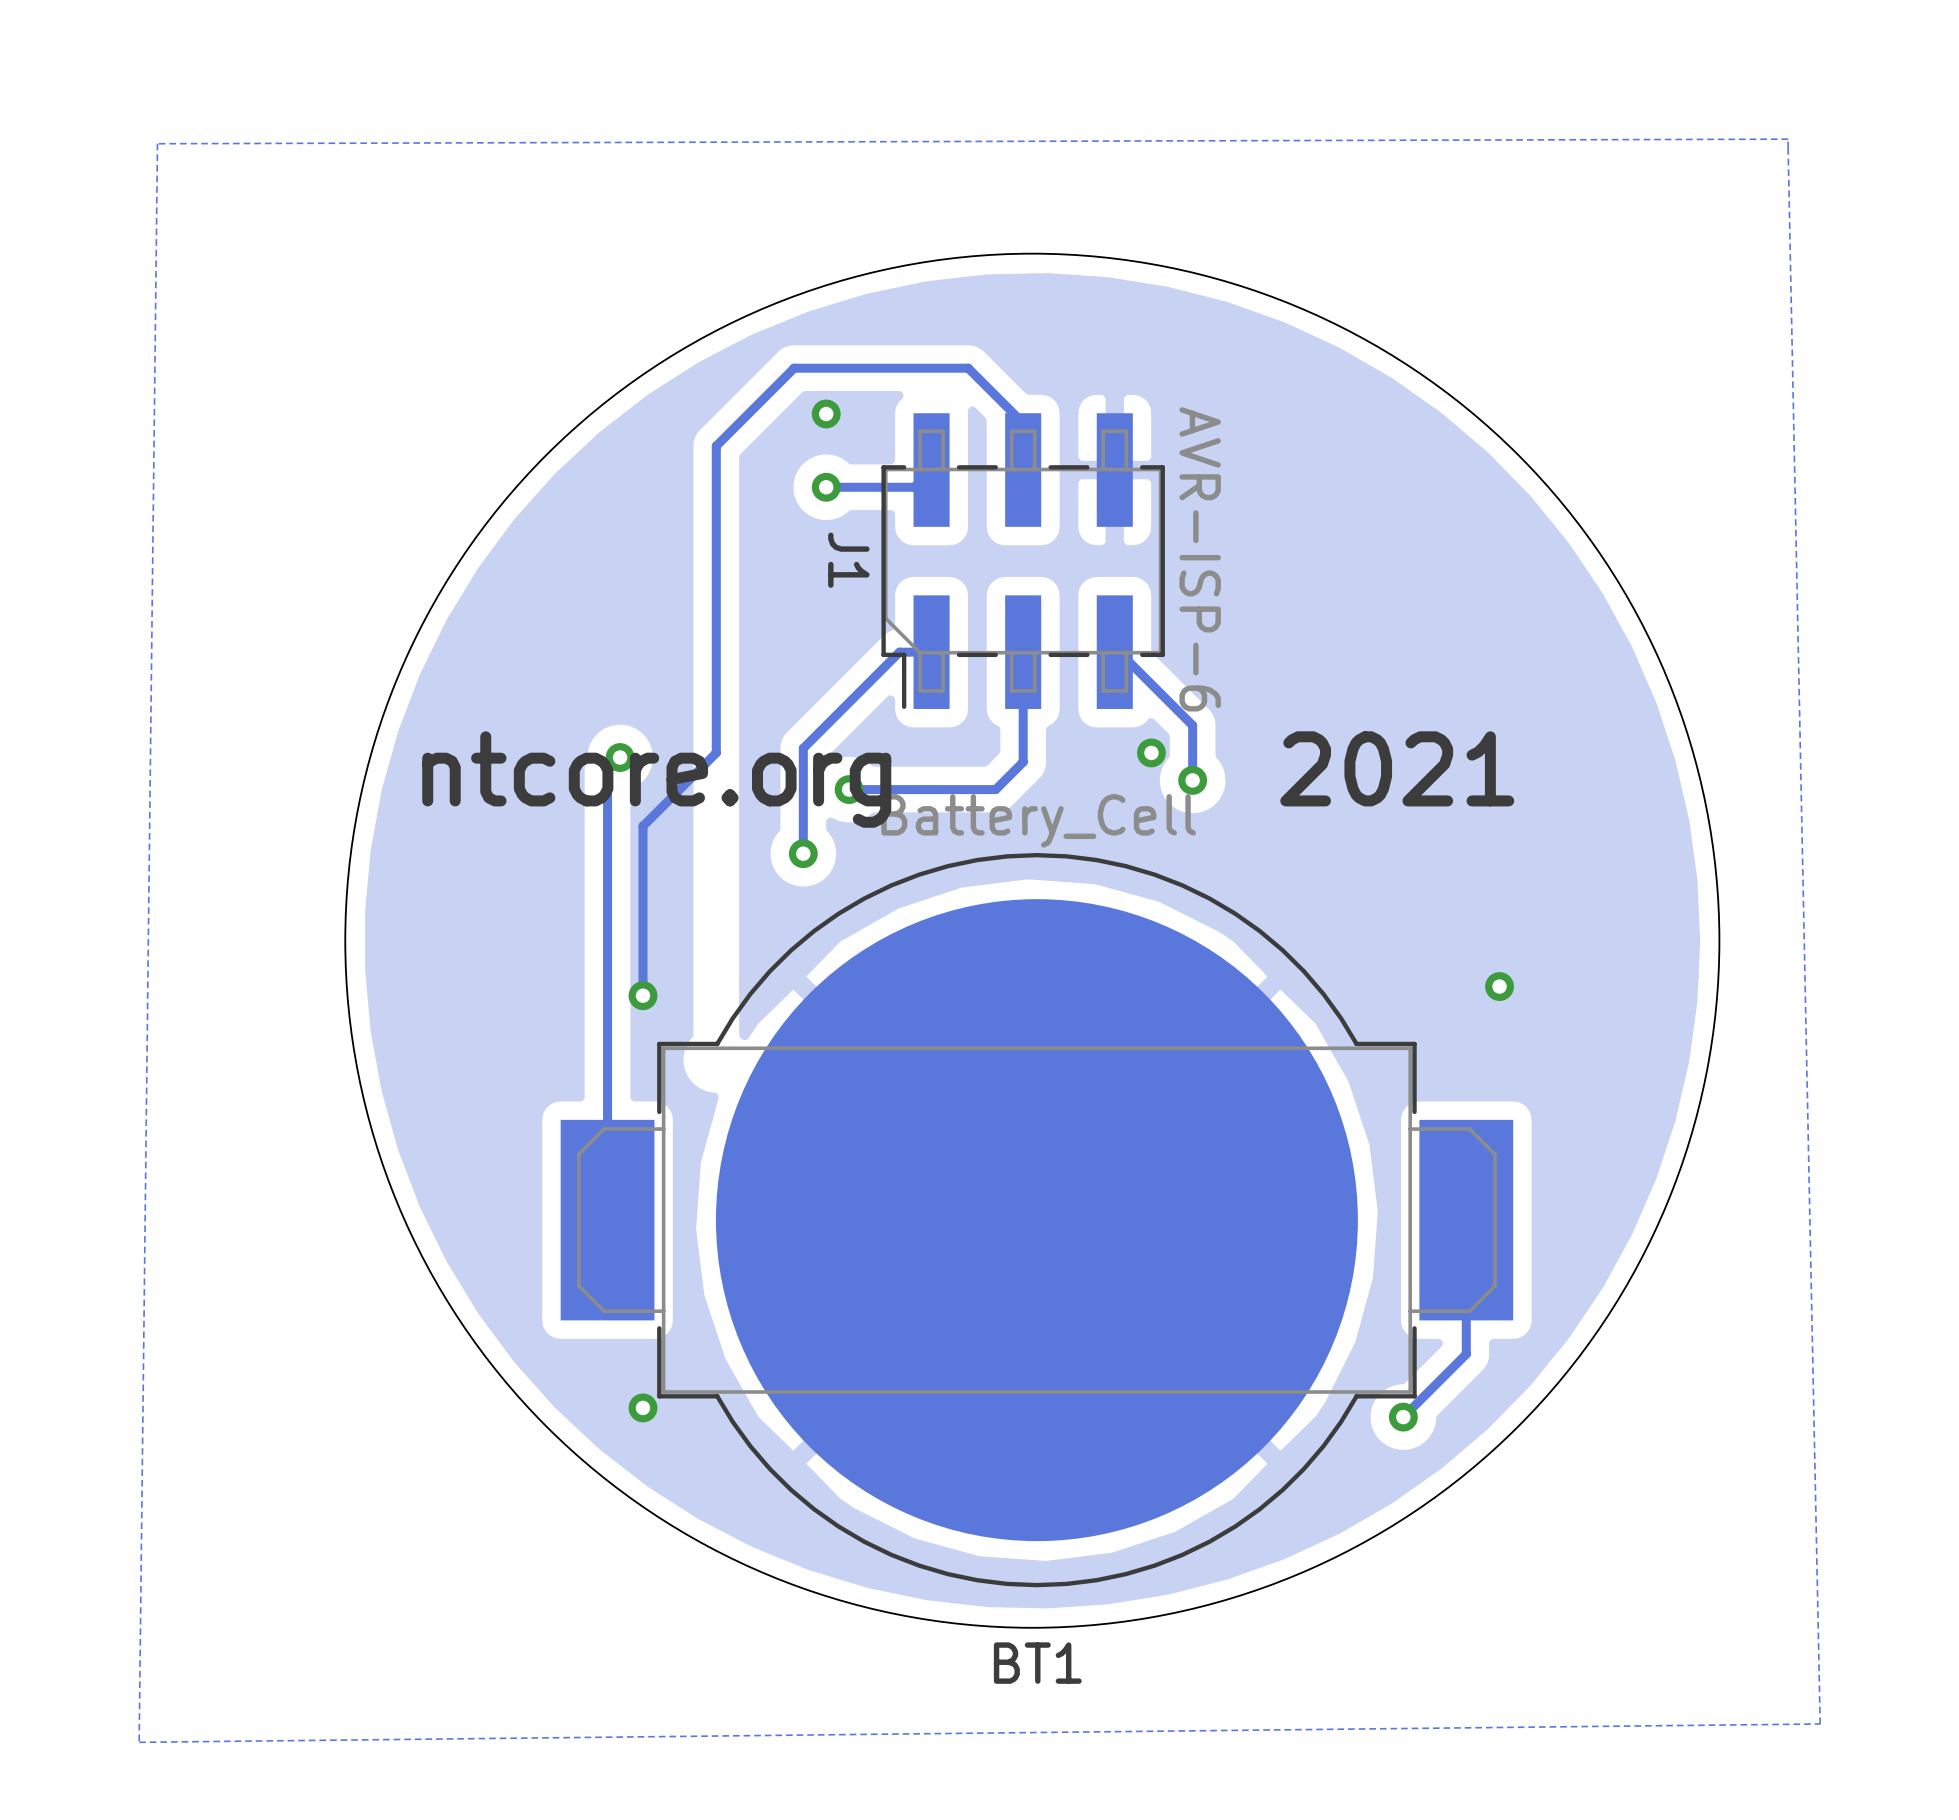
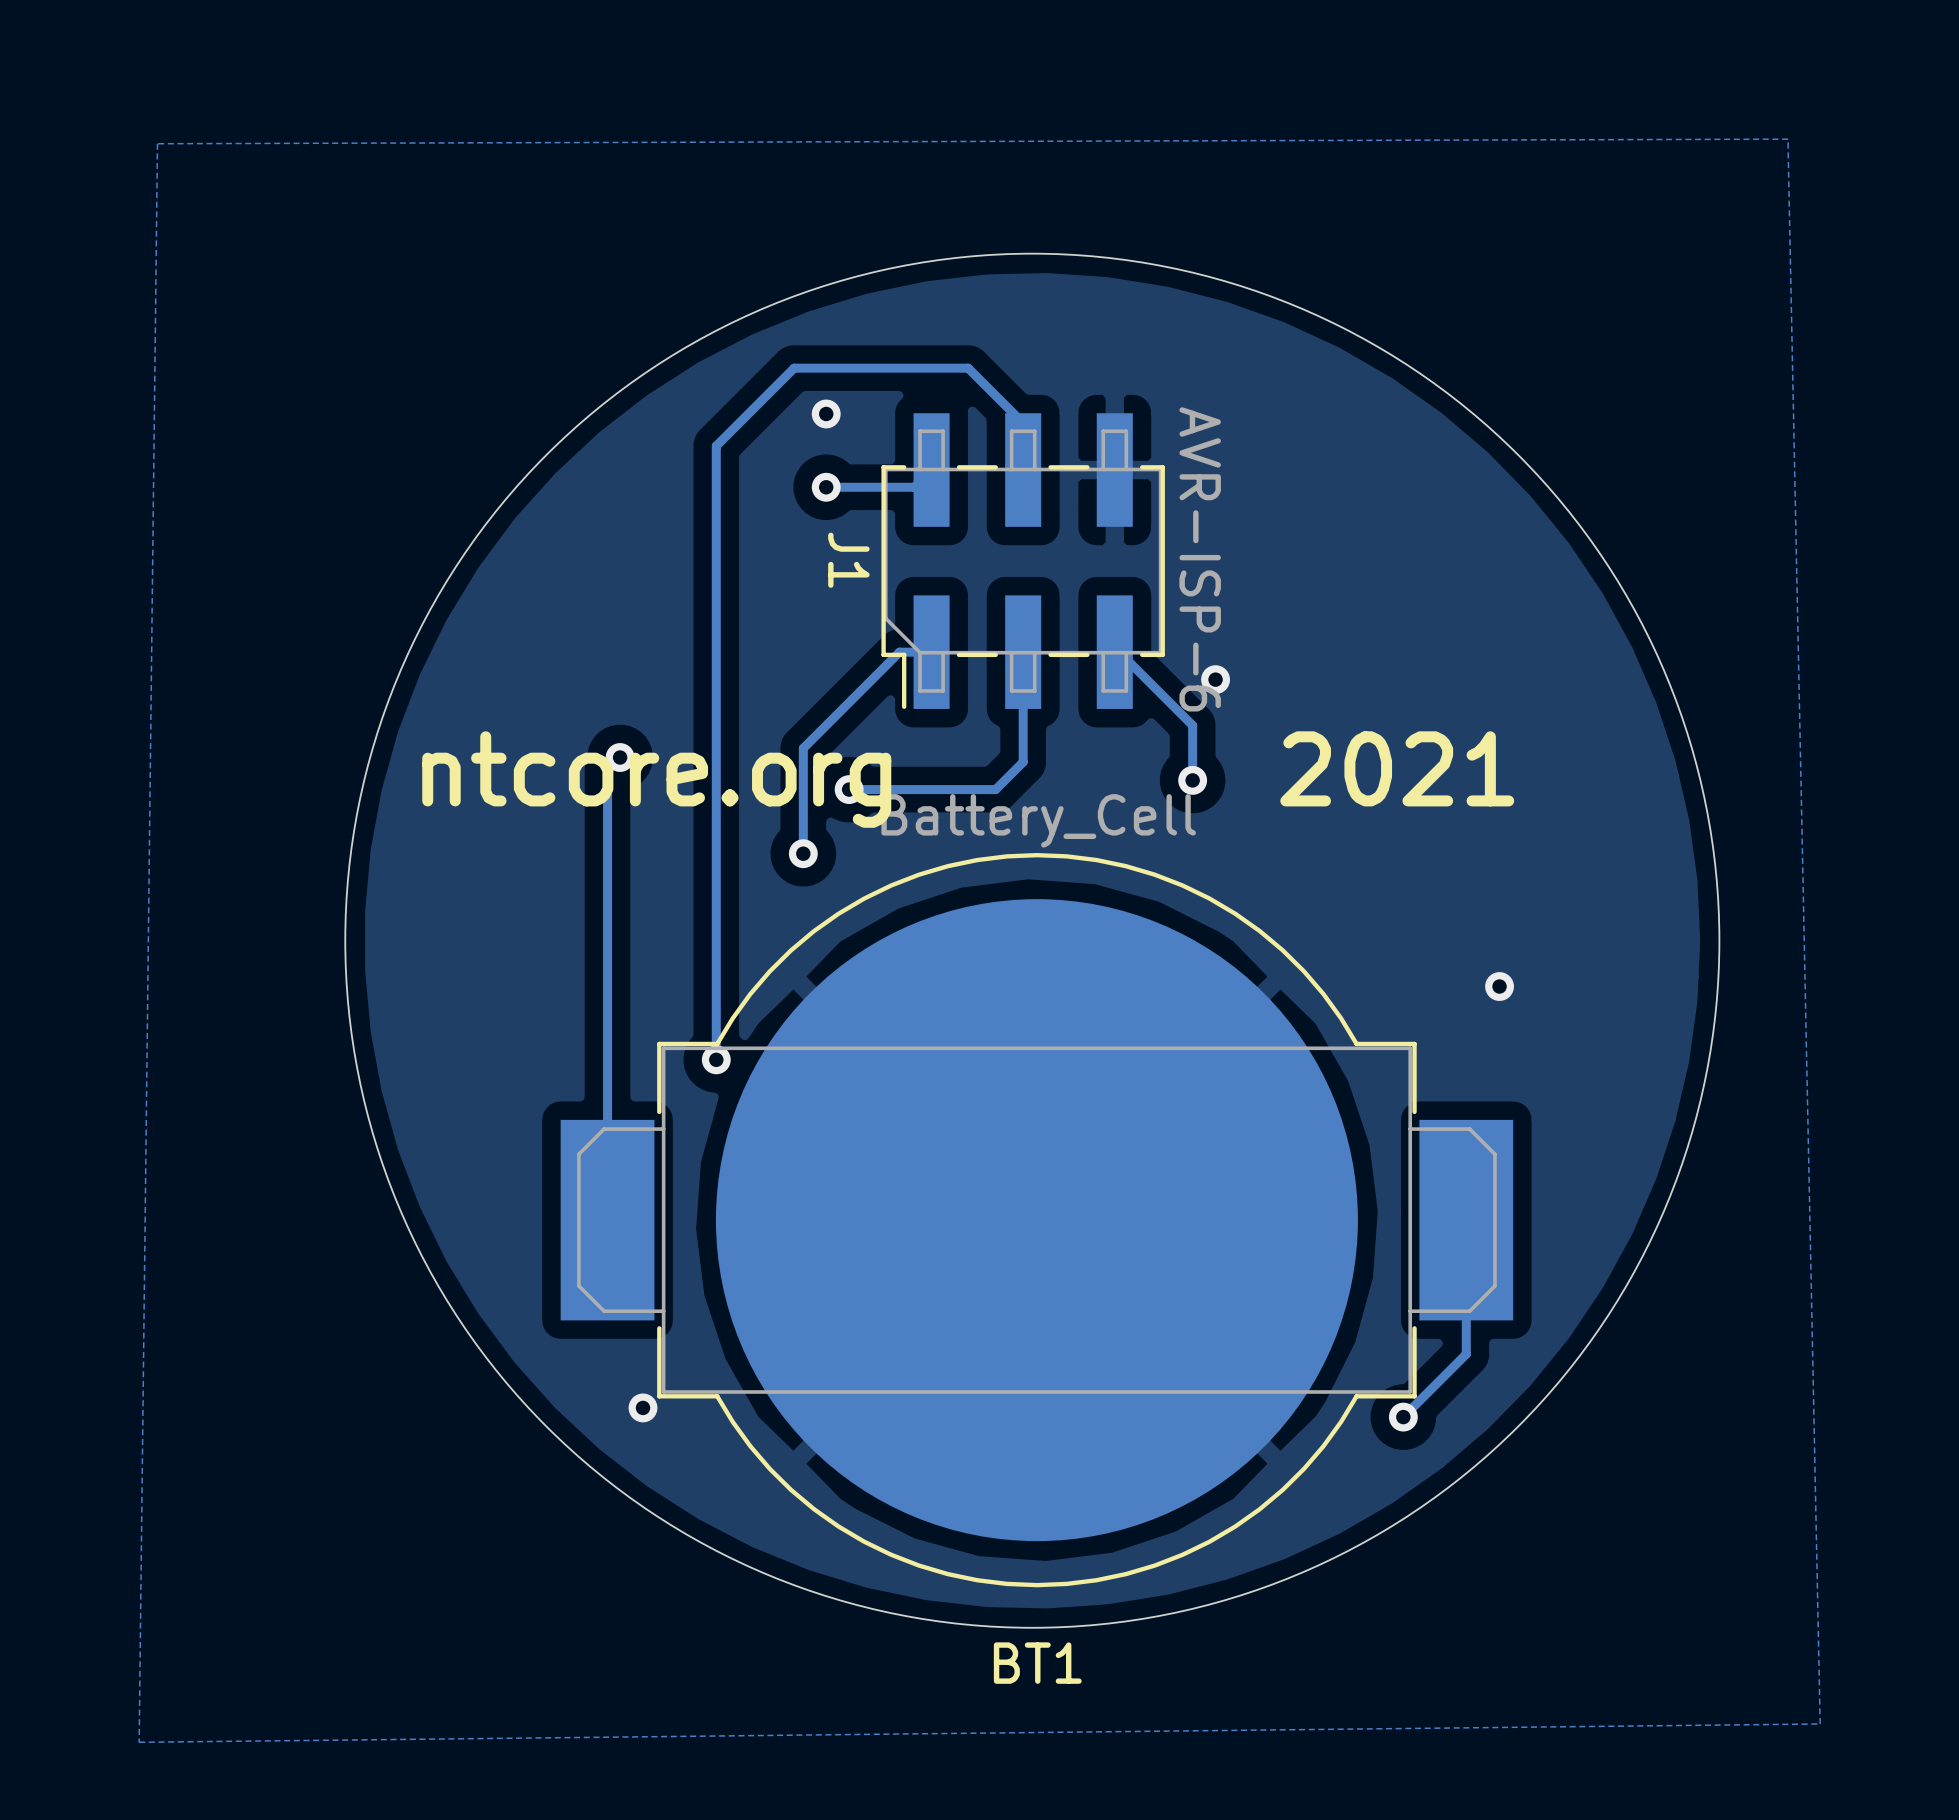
track: (716, 752) (643, 826) (643, 995) -> (716, 752) (716, 1059)
via position: (1151, 752) -> (1215, 679)
via position: (643, 995) -> (716, 1059)

